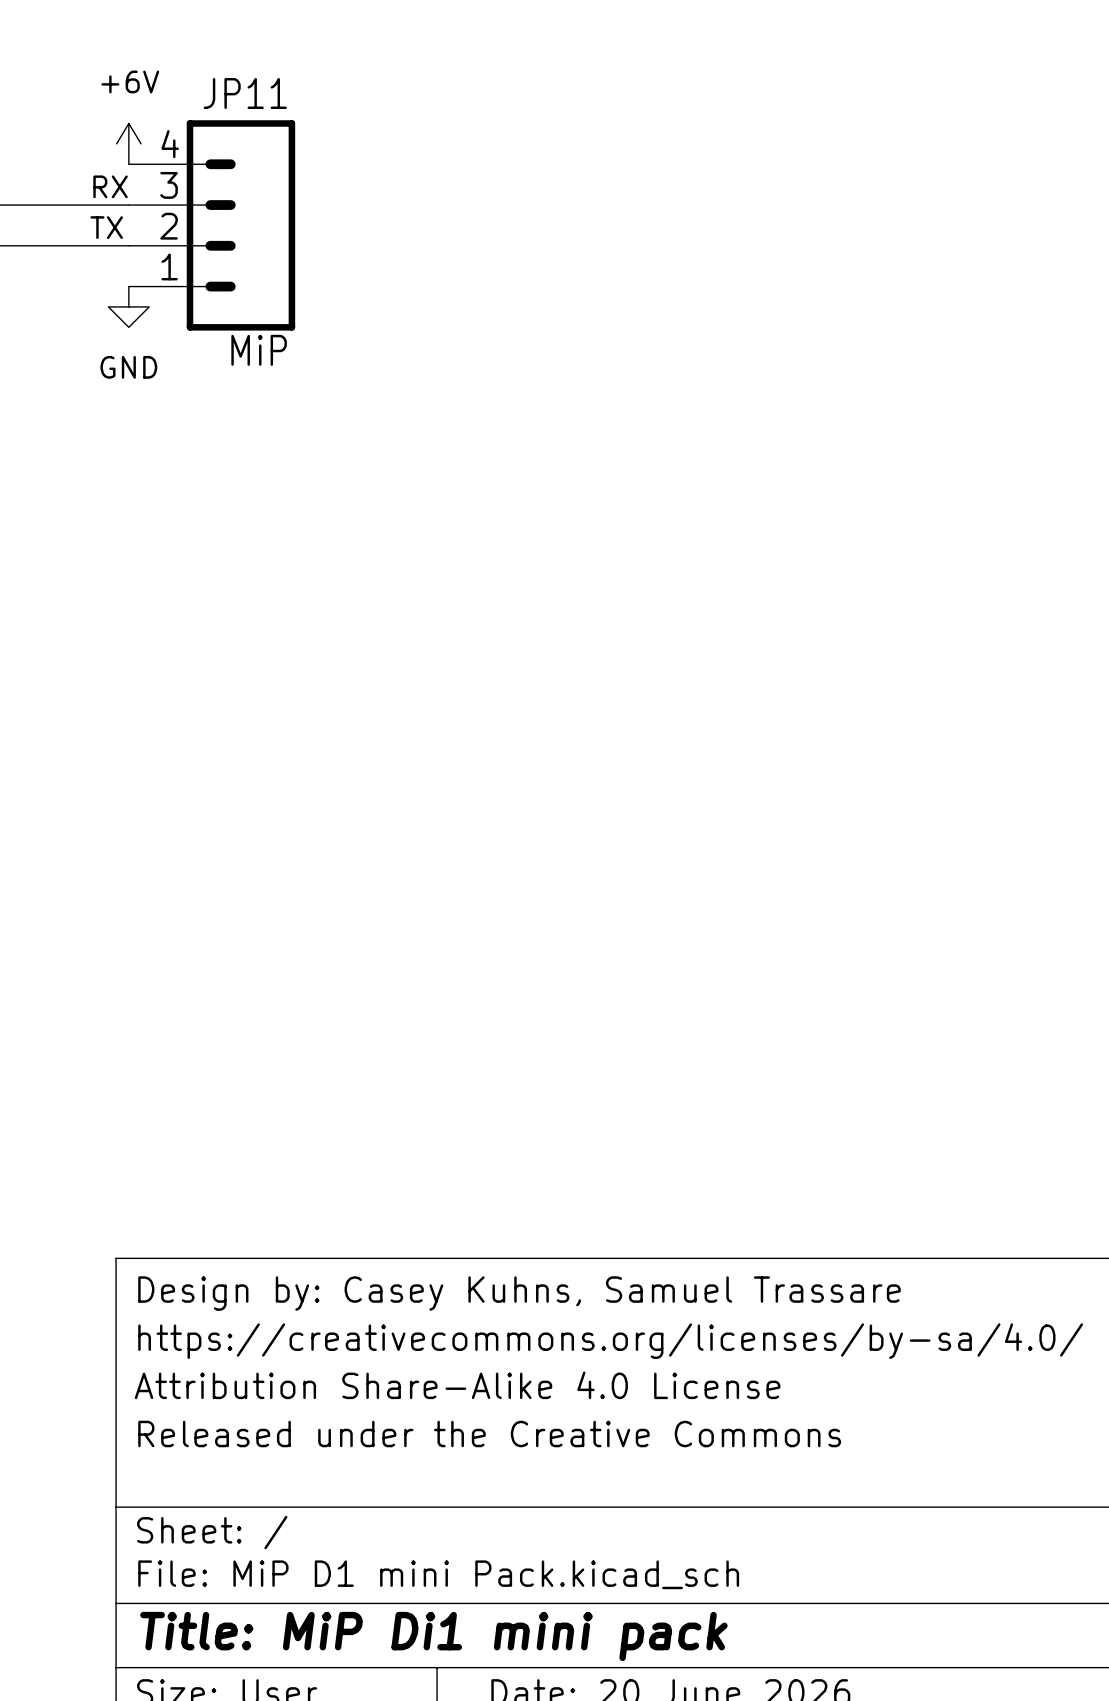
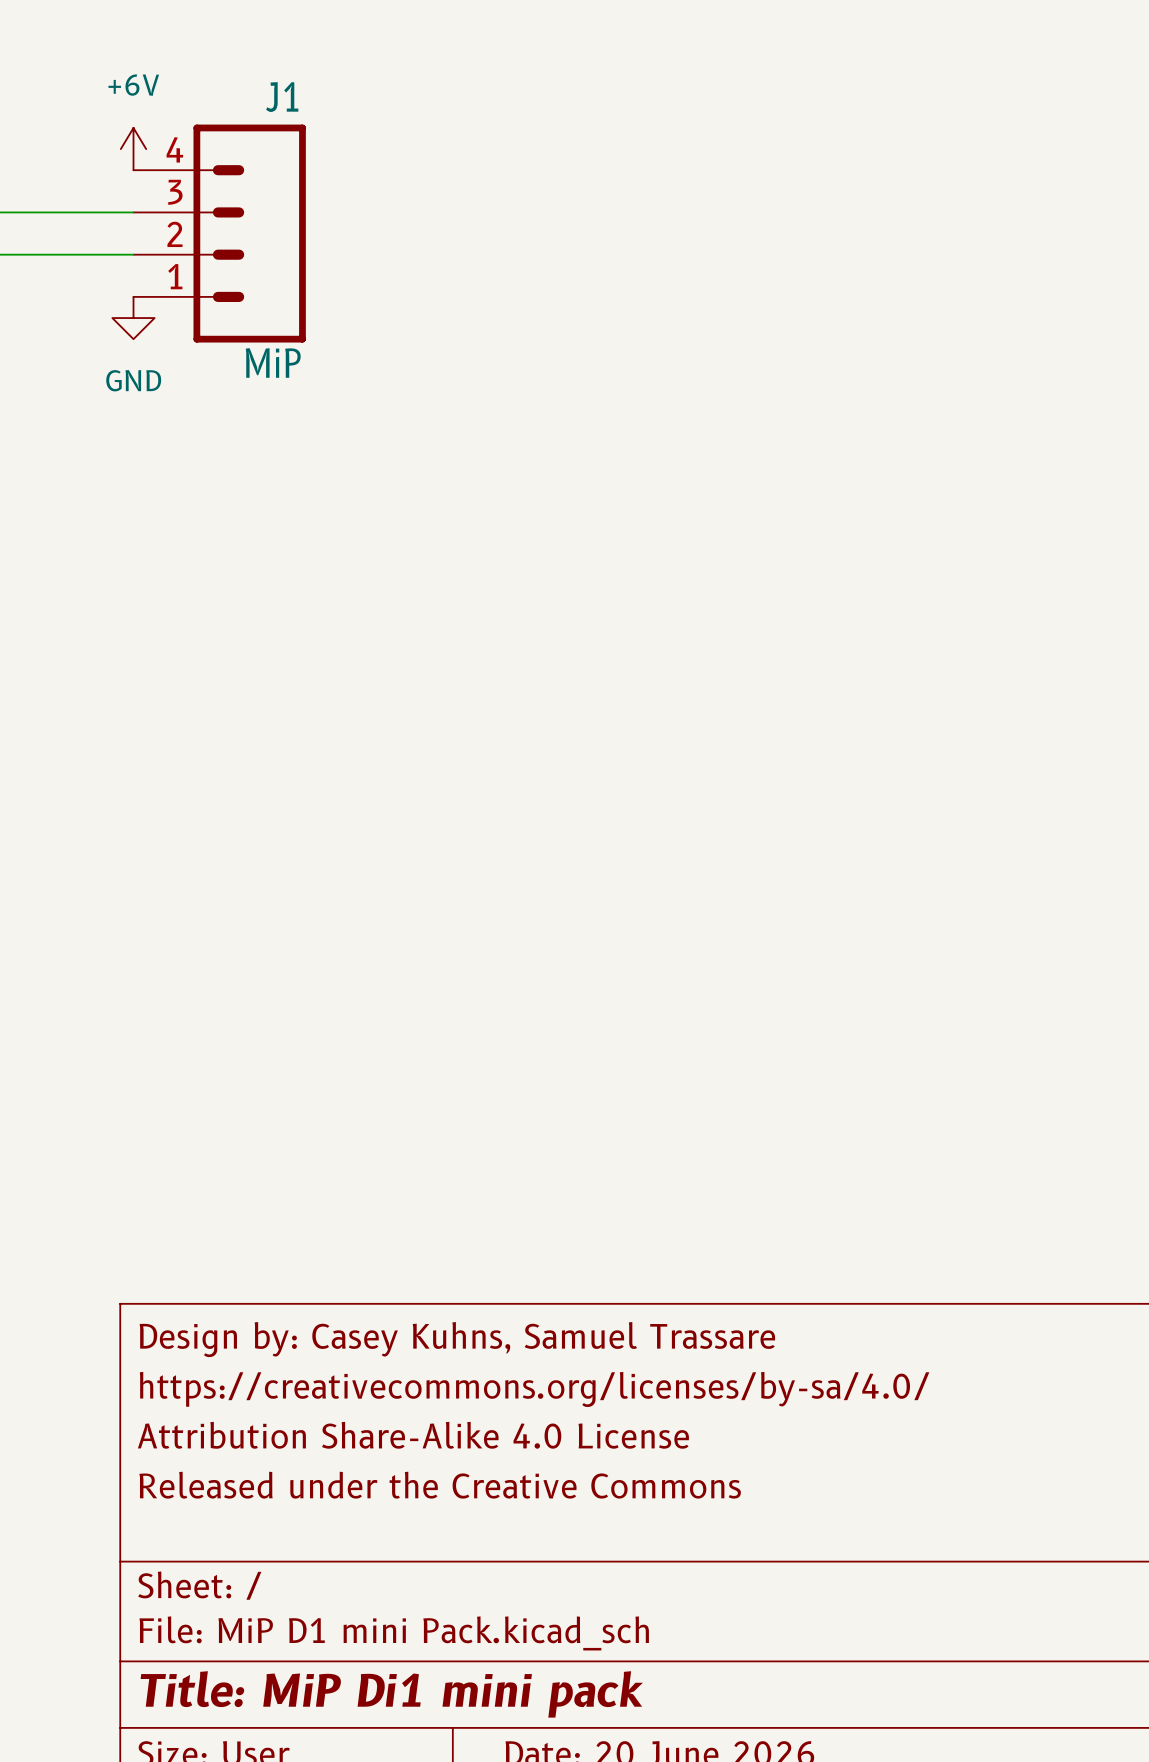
JP11 name: JP11 (245, 93) -> J1 (282, 97)
label: RX (110, 186) -> none
label: TX (106, 227) -> none

